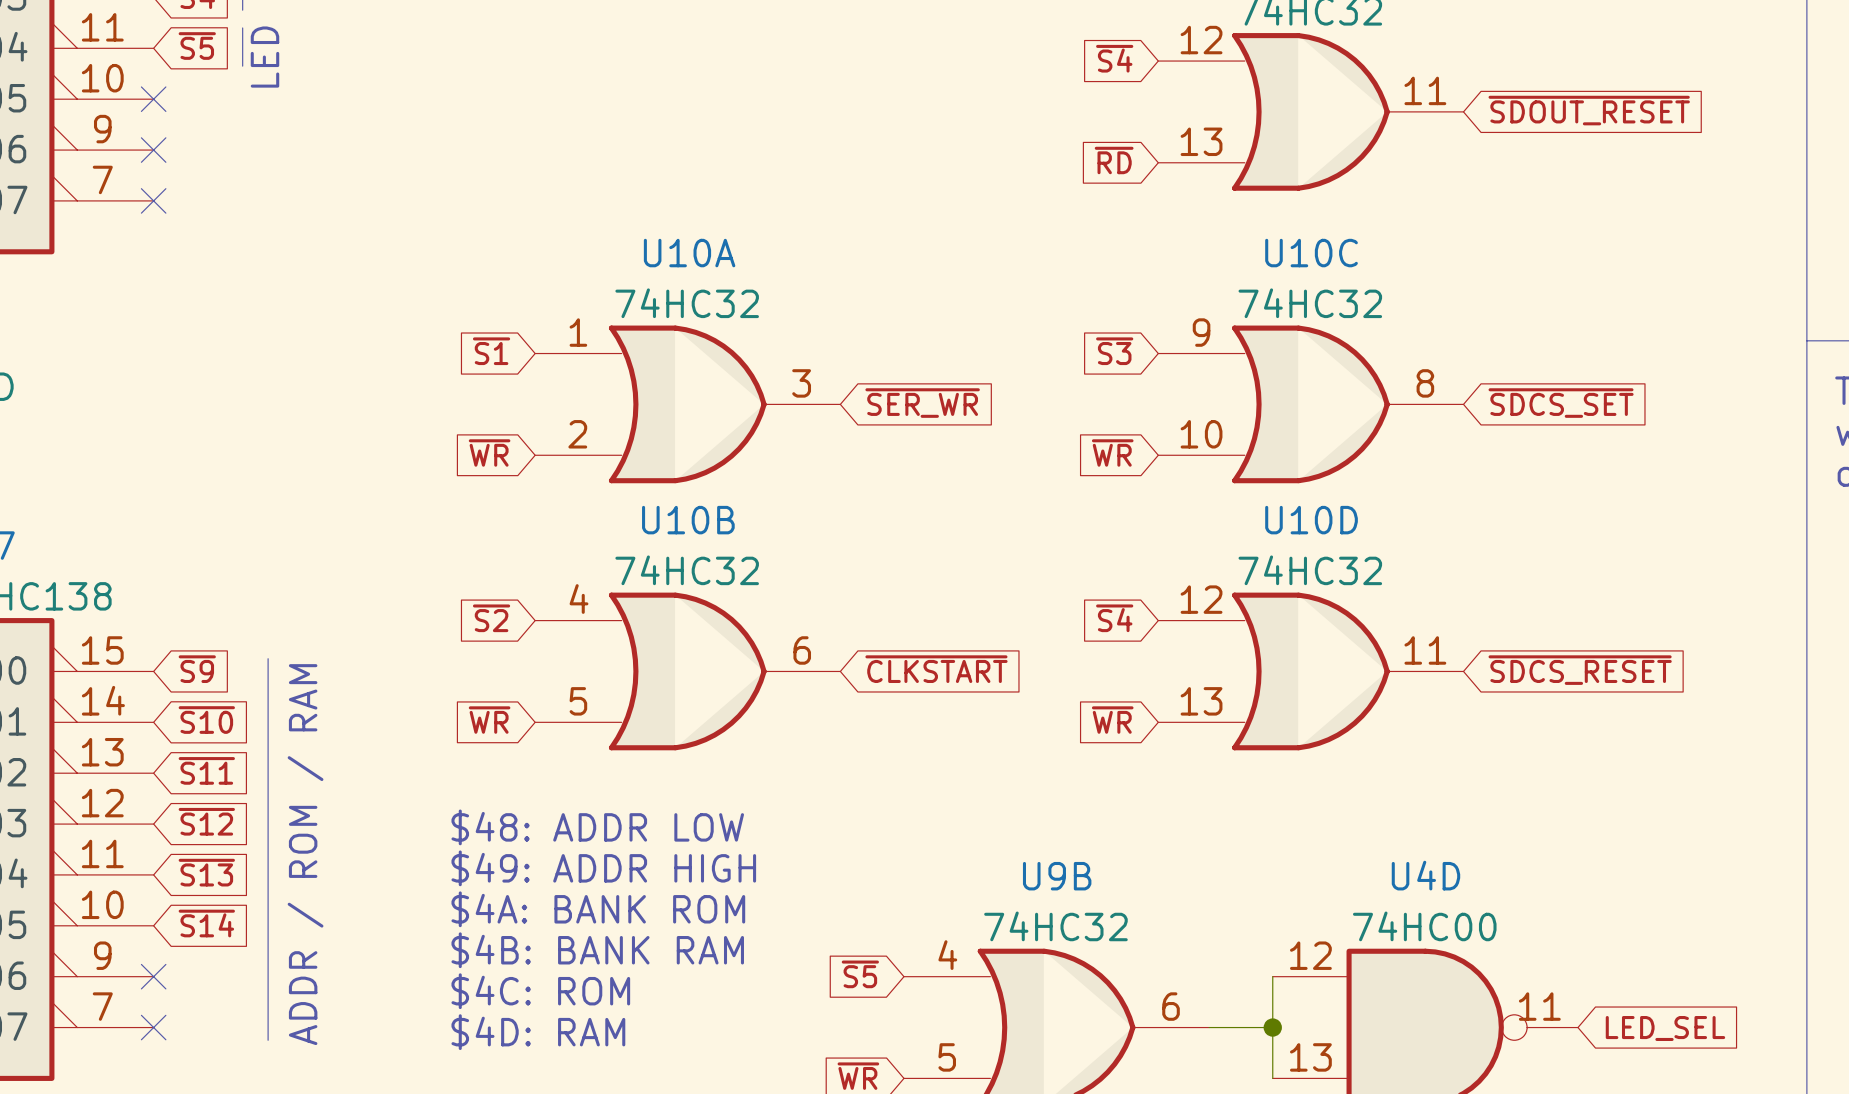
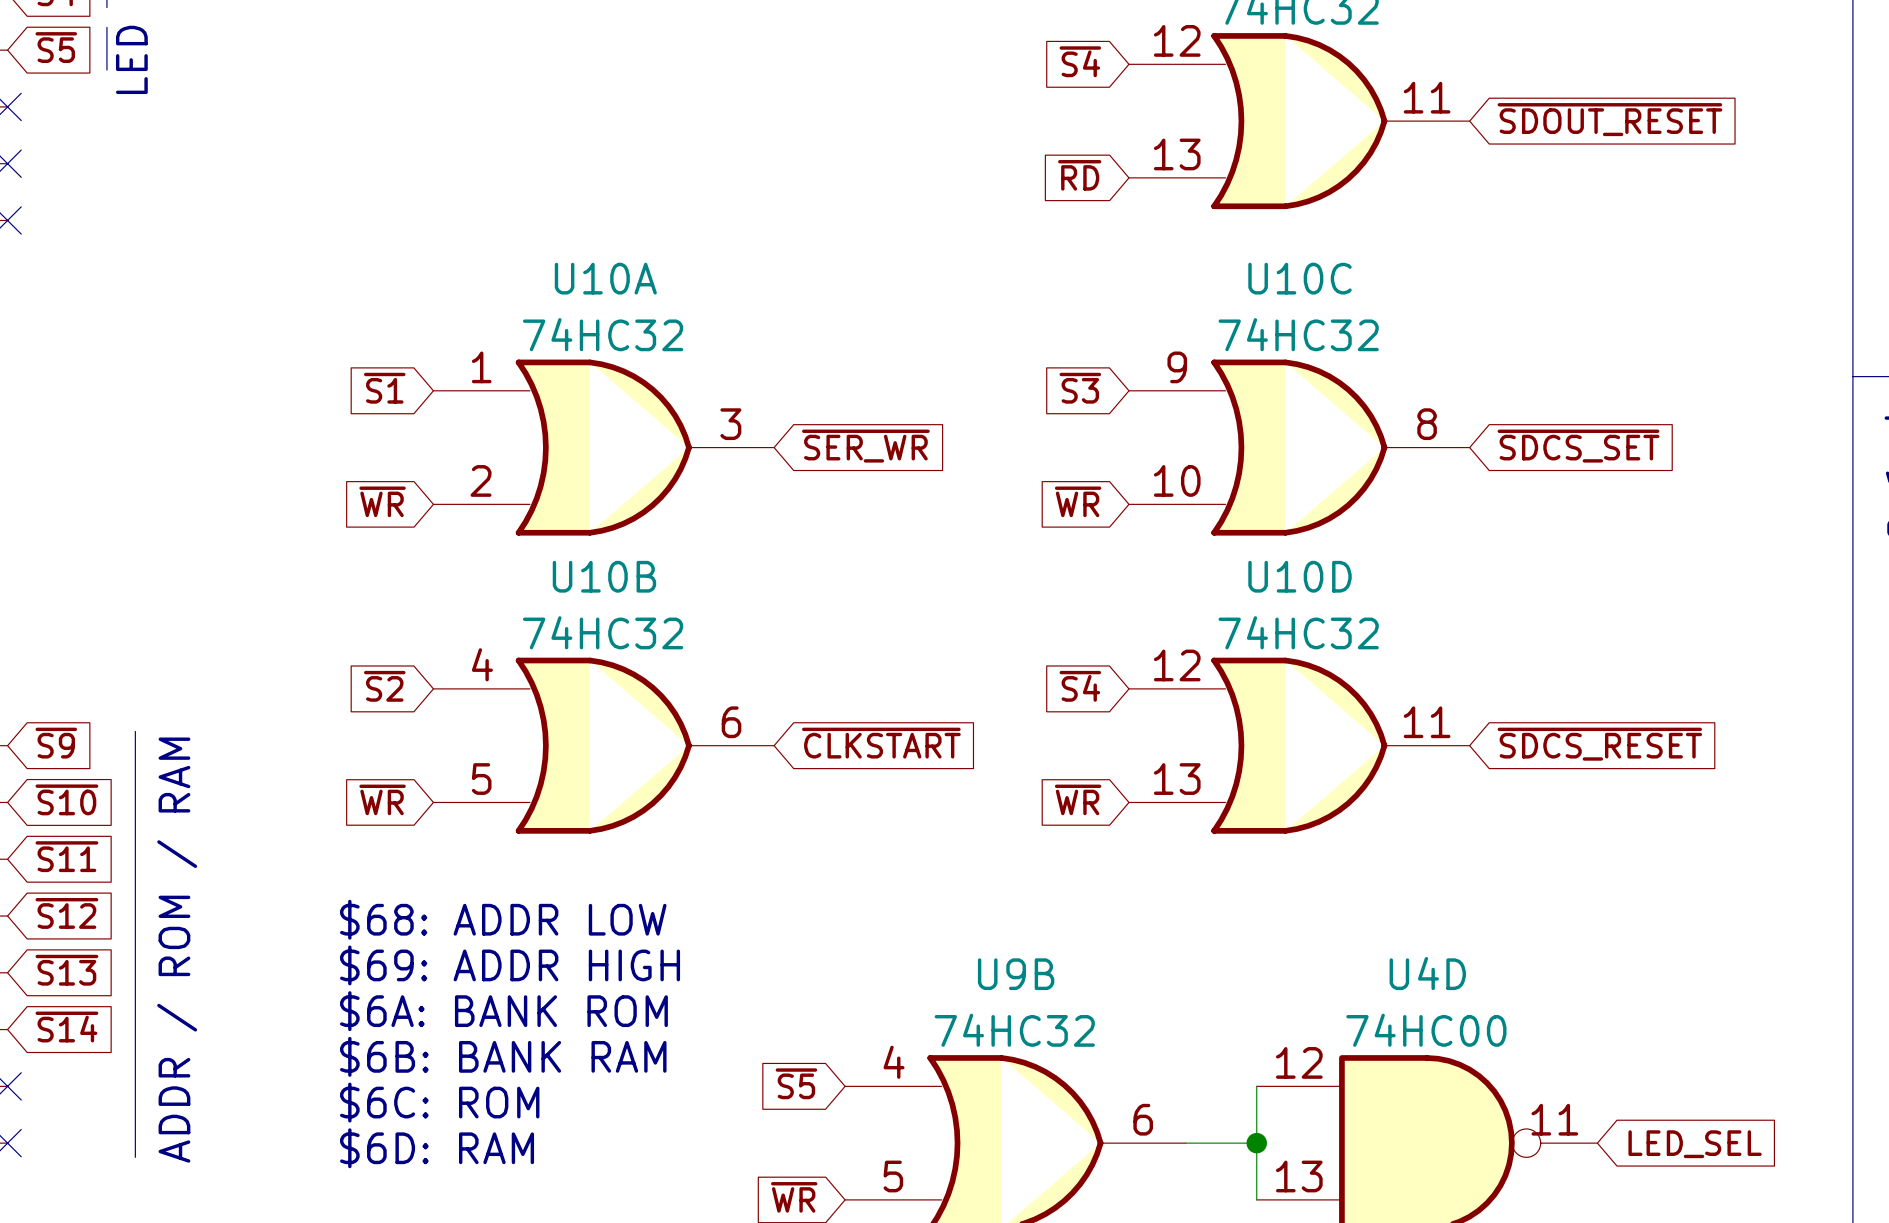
text: $48: ADDR LOW (597, 827) -> $68: ADDR LOW (503, 919)
text: $49: ADDR HIGH (603, 868) -> $69: ADDR HIGH (510, 965)
text: $4A: BANK ROM (598, 909) -> $6A: BANK ROM (503, 1011)
text: $4B: BANK RAM (597, 950) -> $6B: BANK RAM (503, 1056)
text: $4C: ROM (540, 991) -> $6C: ROM (439, 1102)
text: $4D: RAM (538, 1032) -> $6D: RAM (437, 1148)

